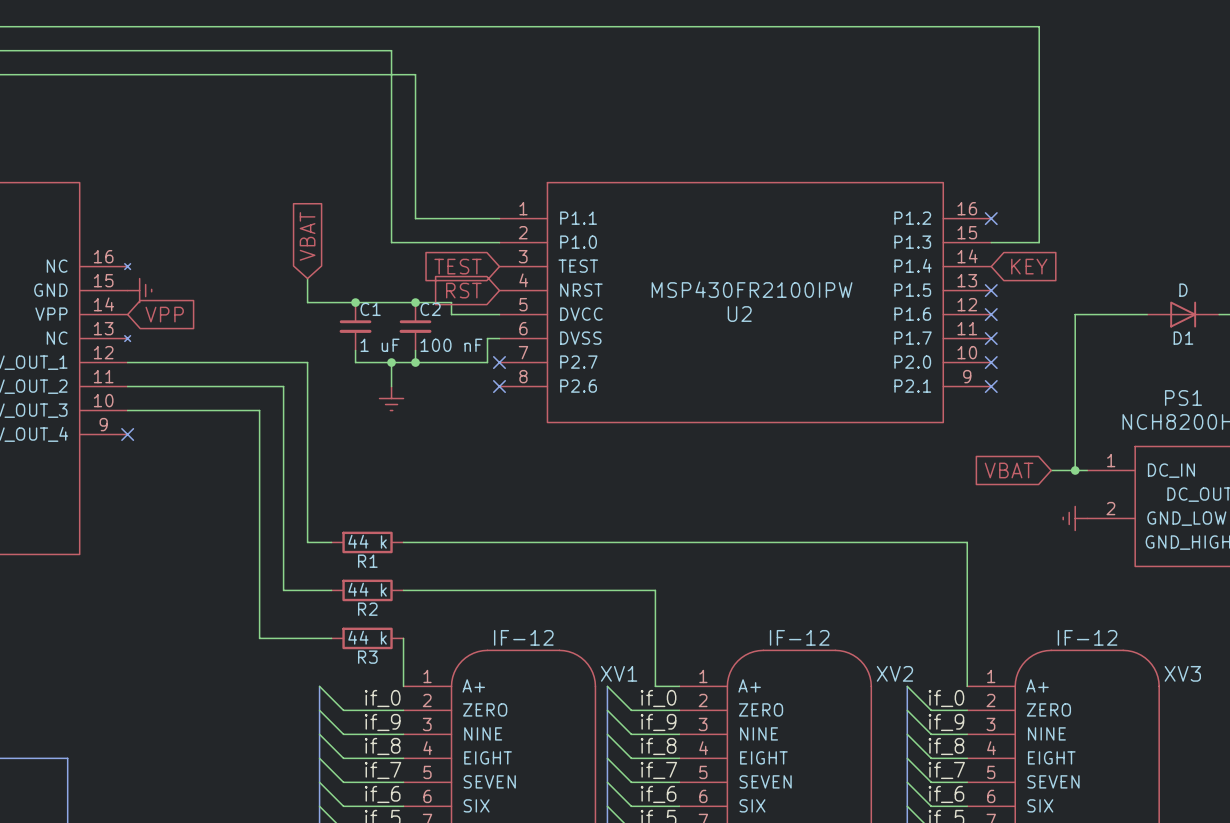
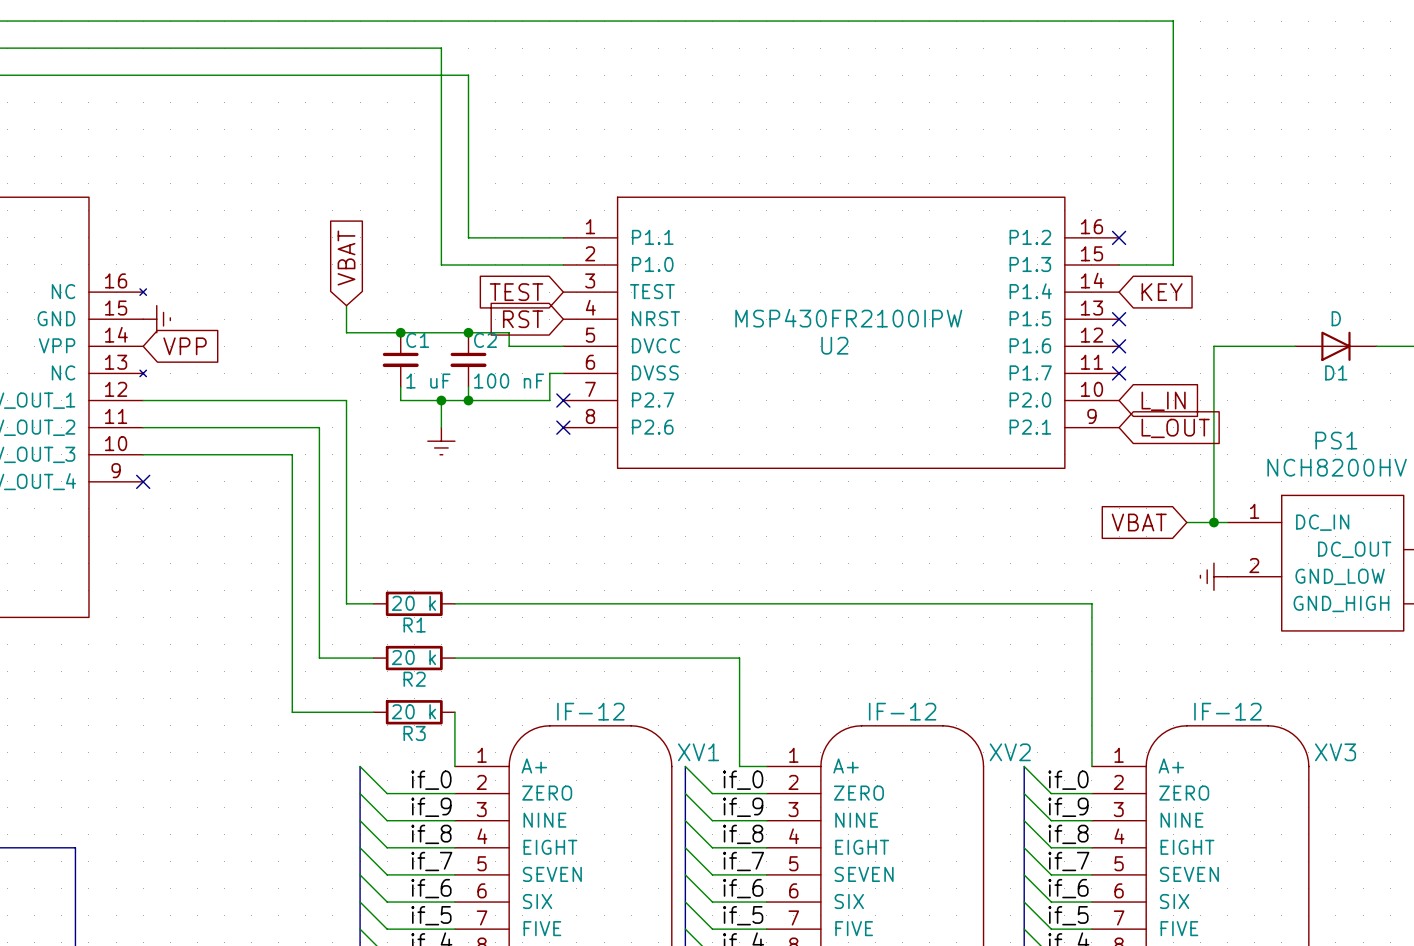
no-connect mark: (991, 362) -> none
global label: none -> L_IN (1163, 401)
no-connect mark: (991, 386) -> none
global label: none -> L_OUT (1175, 428)
R1 value: 44 k (367, 541) -> 20 k (413, 603)
R2 value: 44 k (367, 589) -> 20 k (413, 657)
R3 value: 44 k (367, 637) -> 20 k (413, 711)

